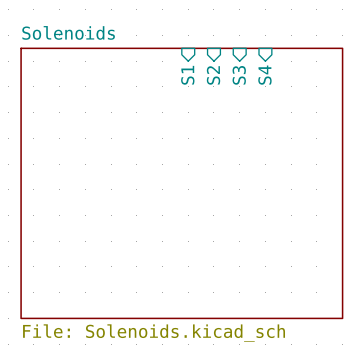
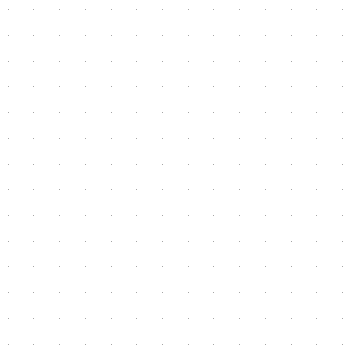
sheet pin: S1 (187, 75) -> none
sheet pin: S2 (213, 75) -> none
sheet pin: S3 (239, 75) -> none
sheet pin: S4 (264, 75) -> none
sheet Solenoids: File: Solenoids.kicad_sch (181, 183) -> none

